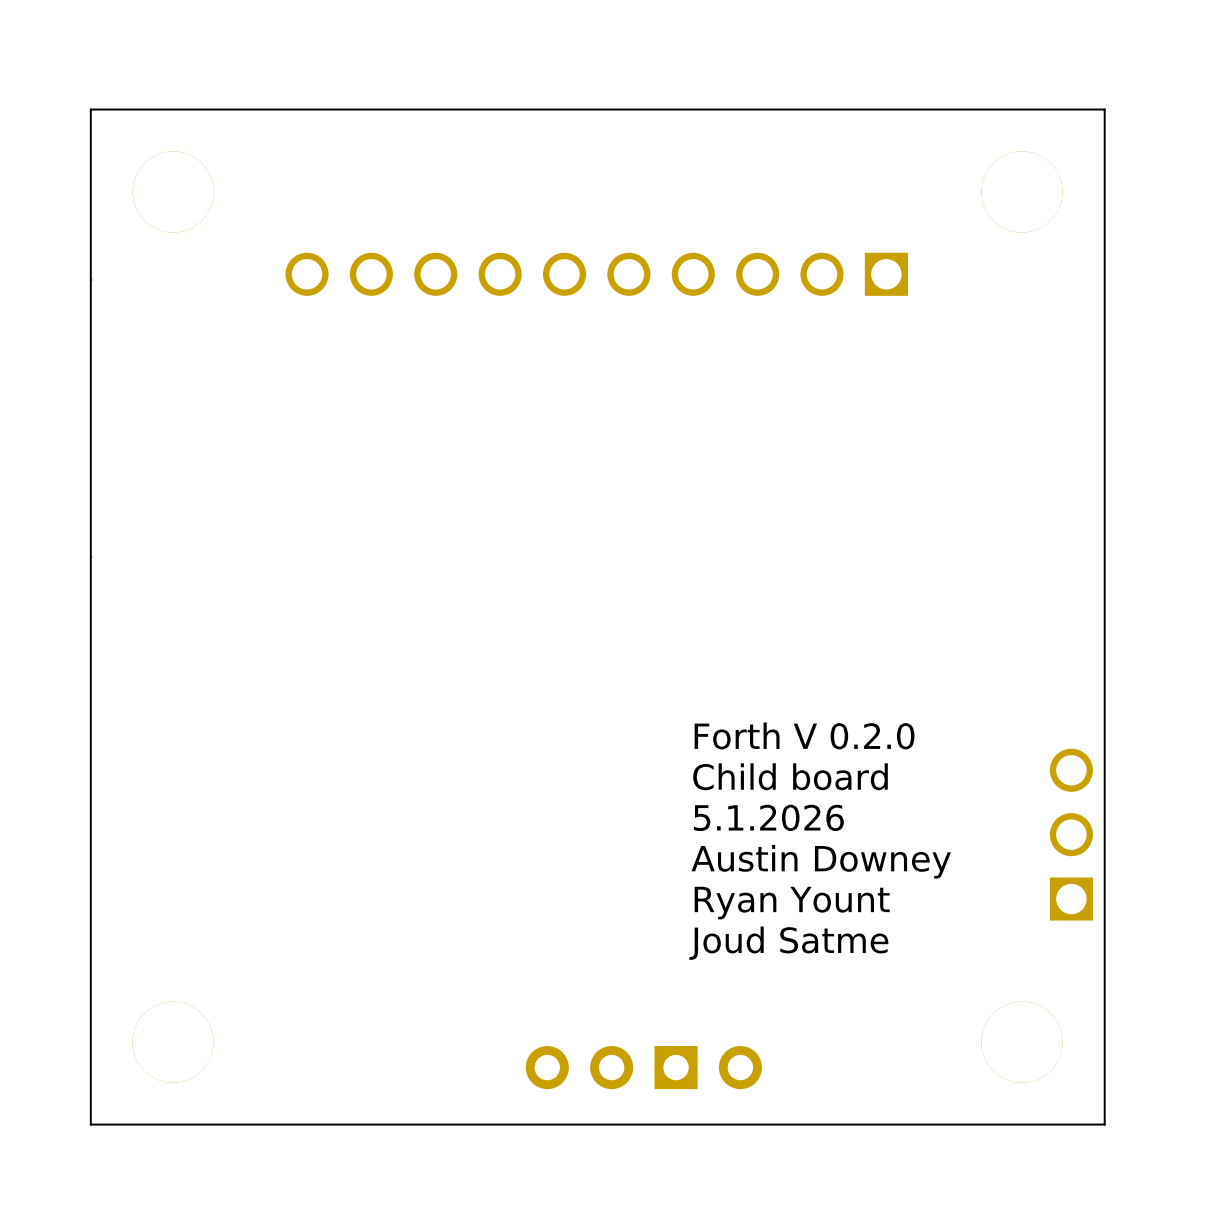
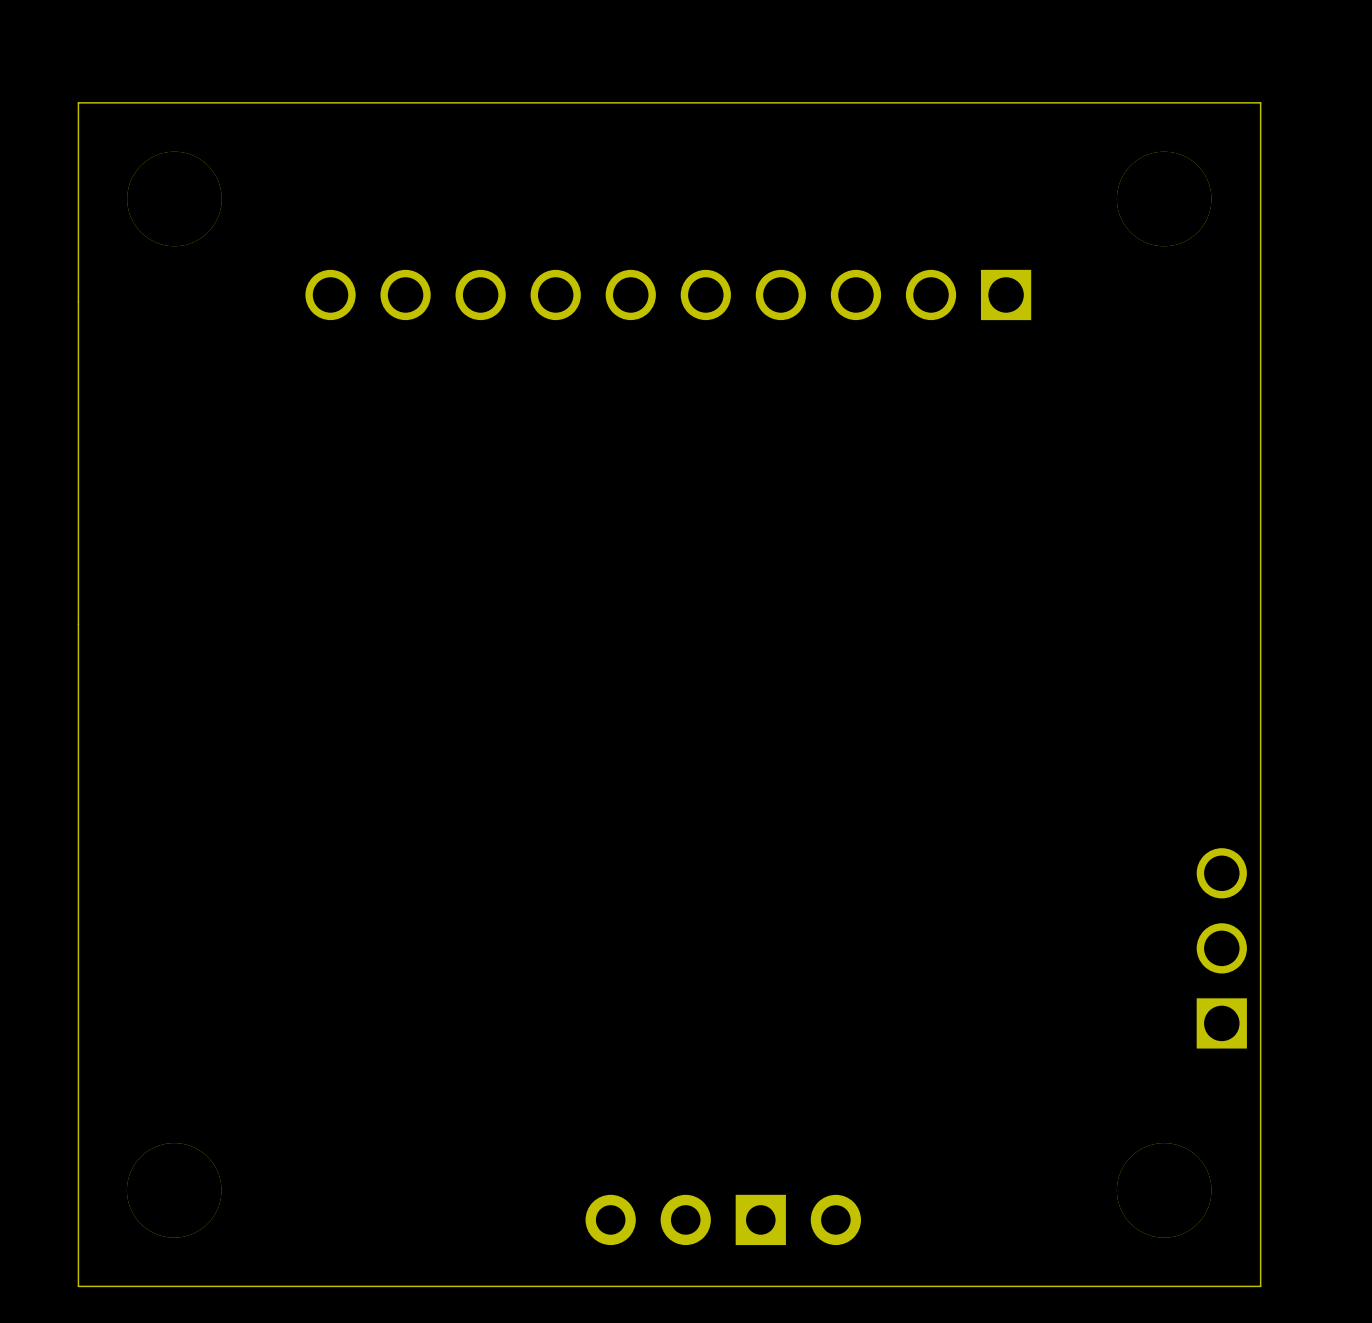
text: Forth V 0.2.0 (804, 735) -> none
text: Child board (790, 776) -> none
text: 5.1.2026 (768, 817) -> none
text: Austin Downey (821, 861) -> none
text: Ryan Yount (792, 903) -> none
text: Joud Satme (788, 943) -> none

